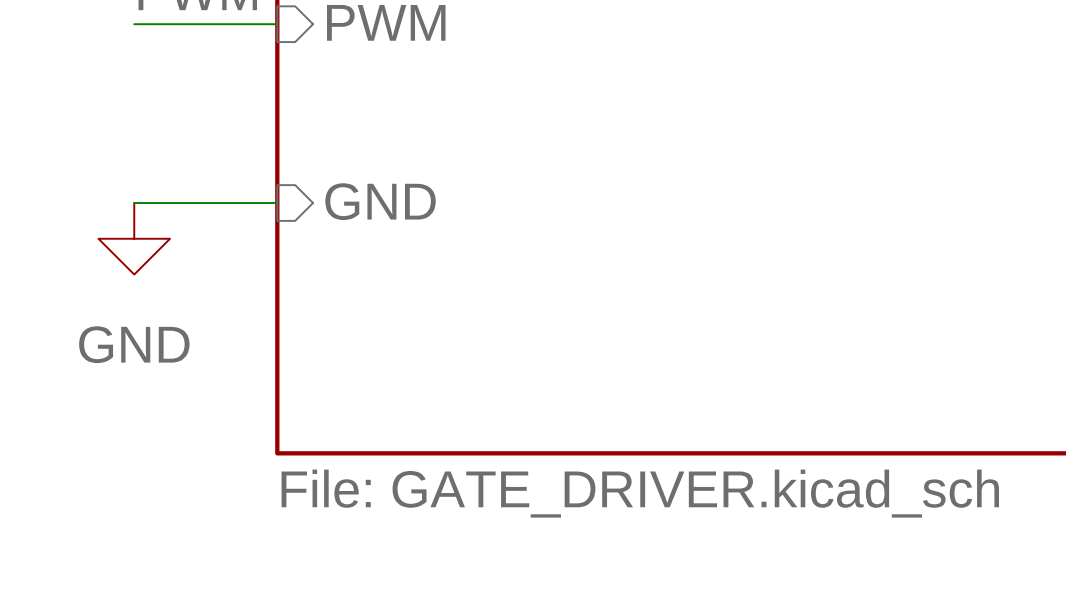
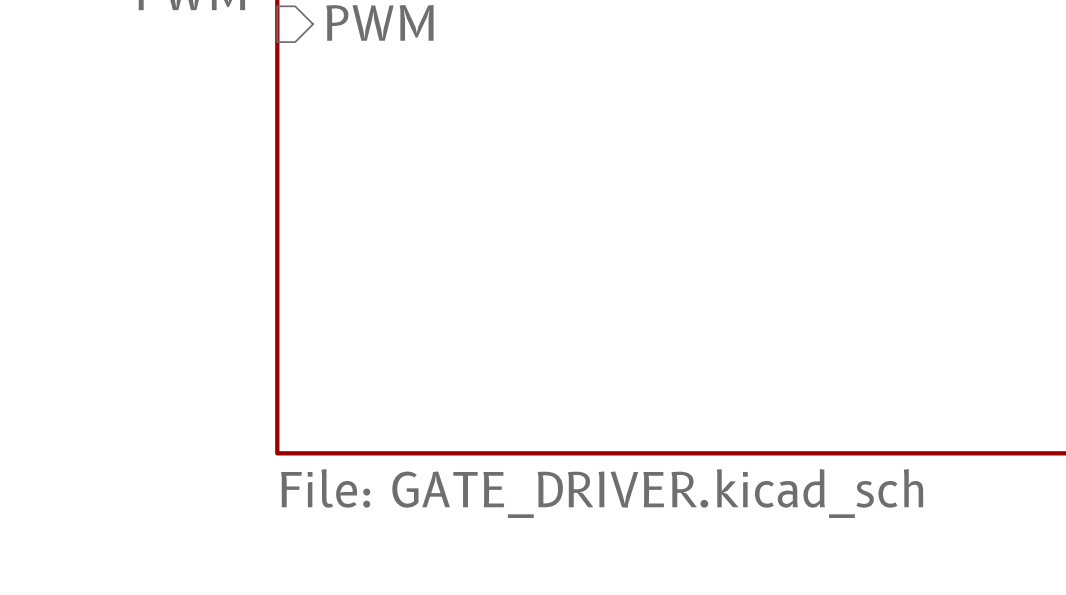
wire: (134, 24) (277, 24) -> none
sheet pin: GND (380, 201) -> none
wire: (134, 203) (277, 203) -> none
power symbol: GND (134, 238) -> none

